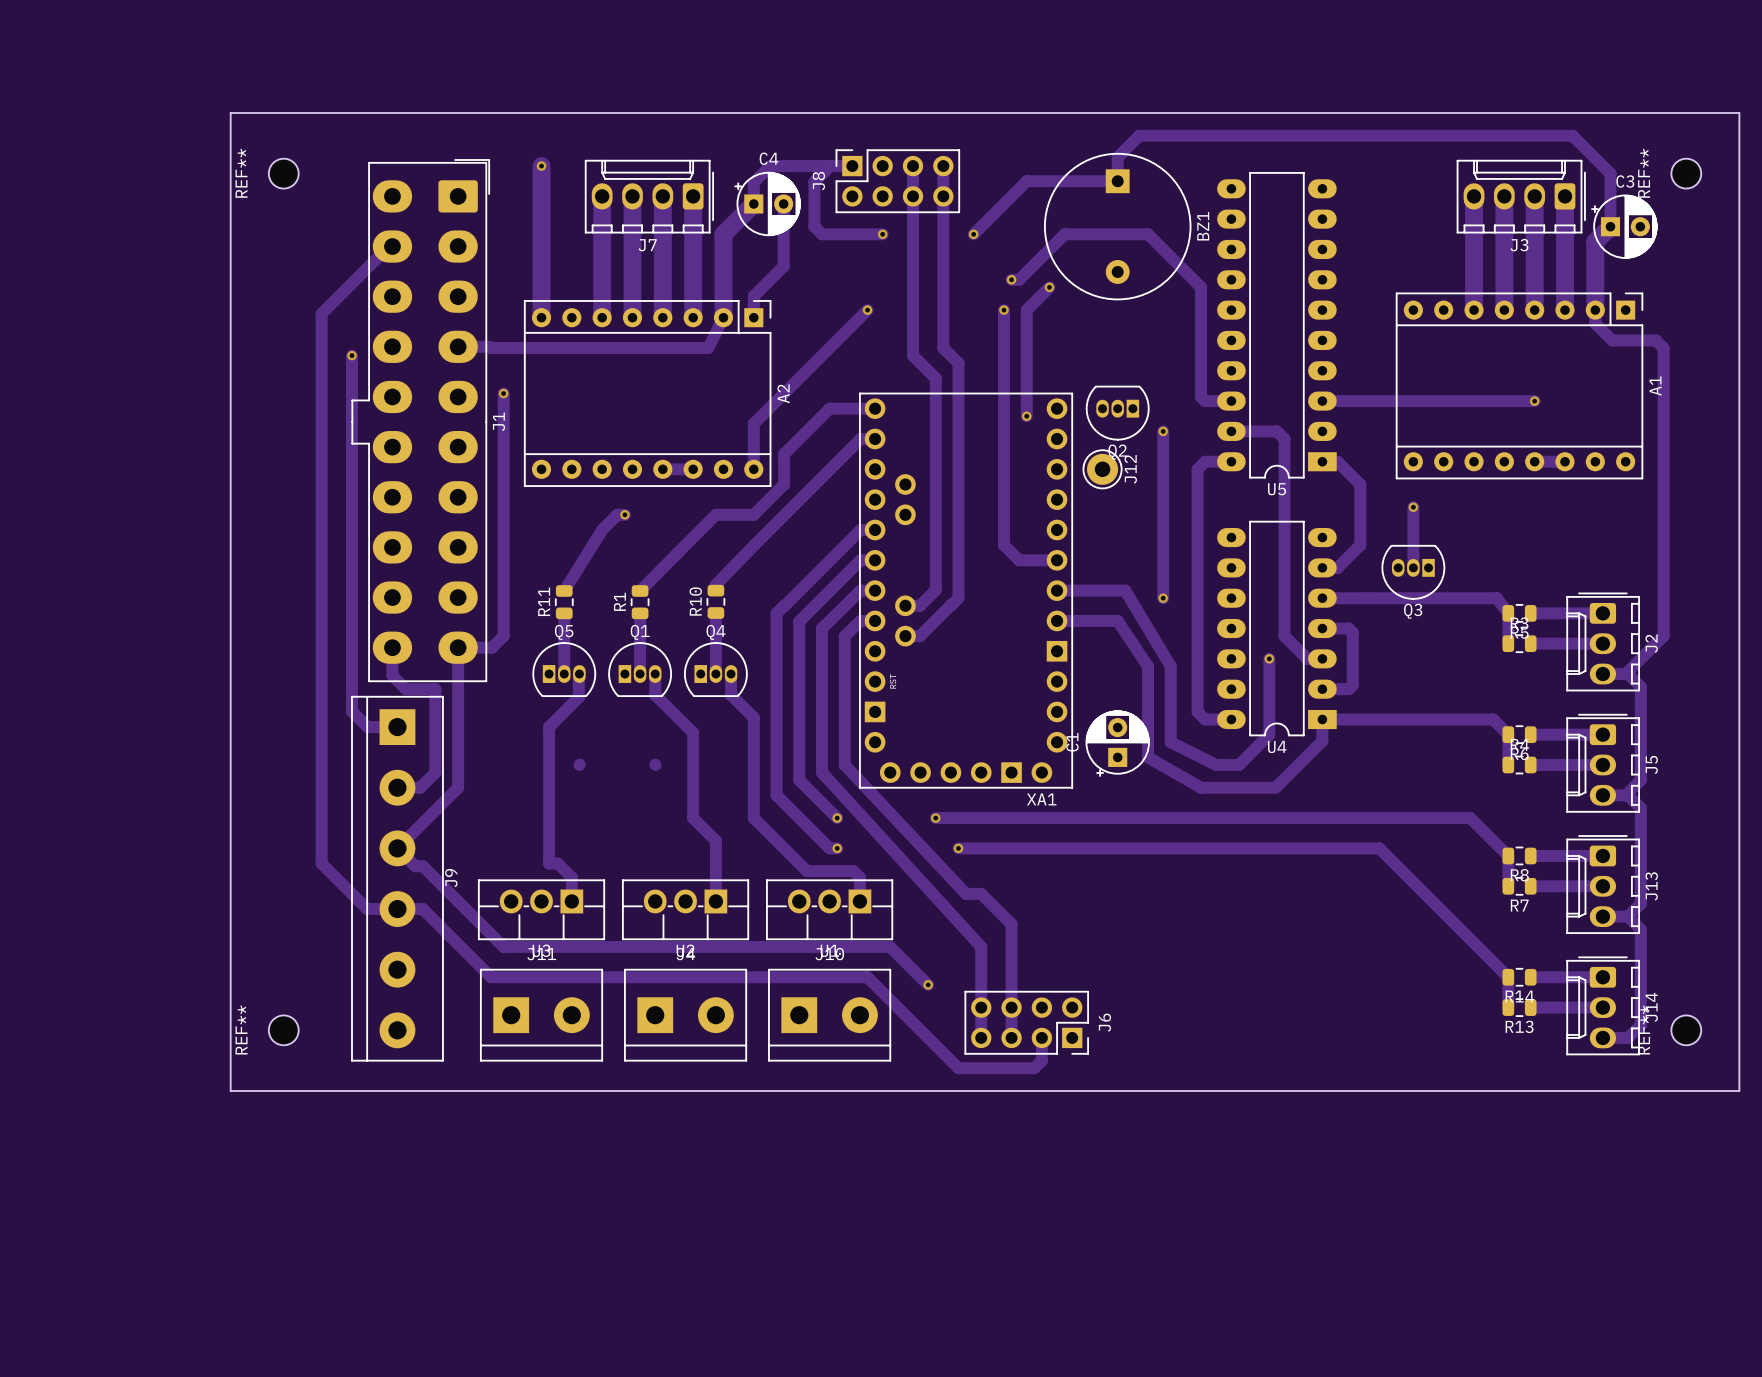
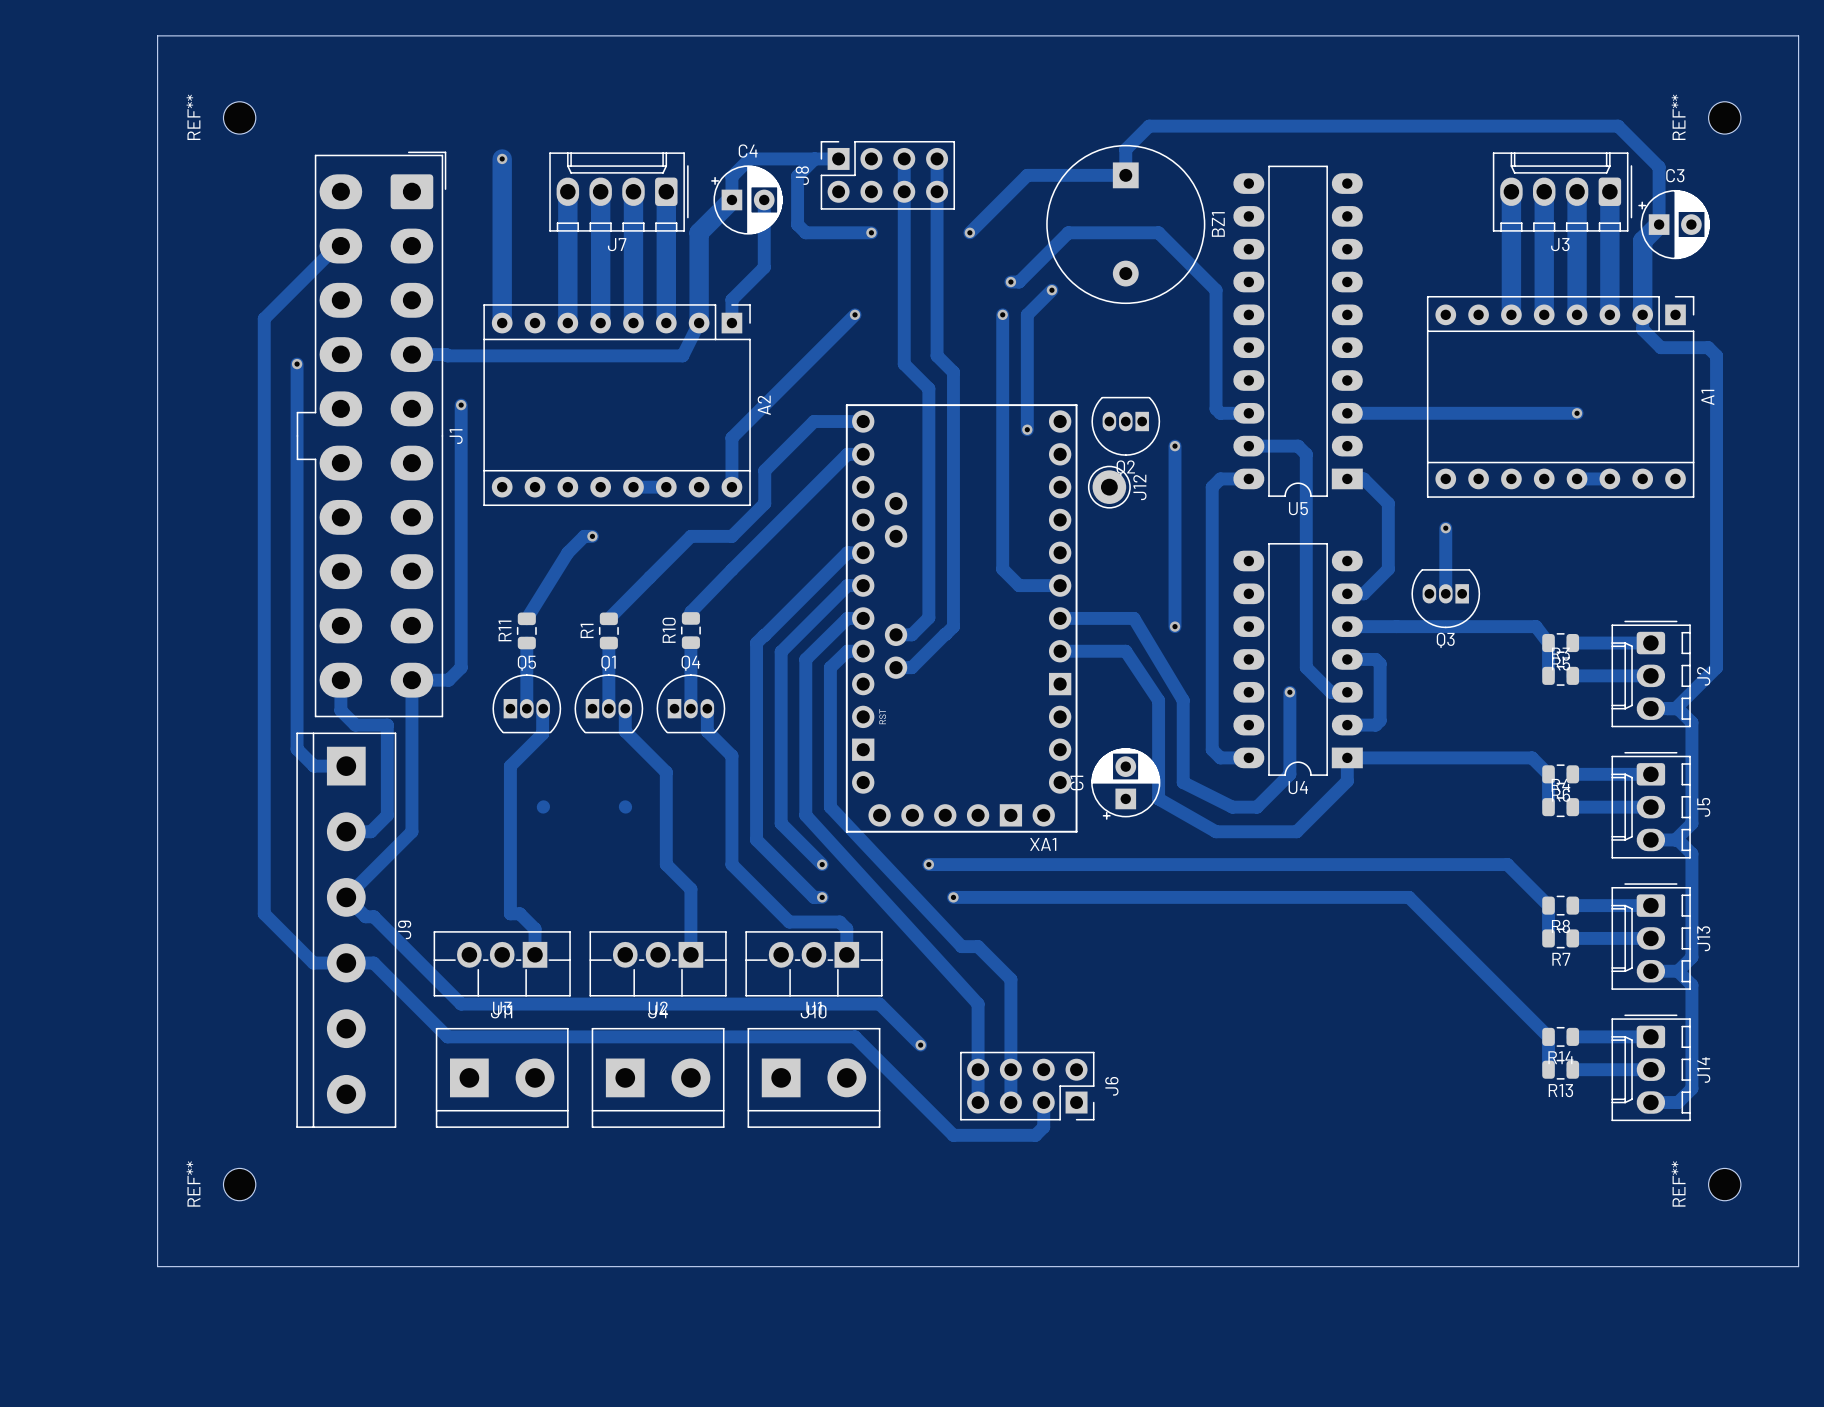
board edge: (1739, 113) (230, 113) (230, 1090) (1739, 1090) -> (1798, 101) (1798, 35) (157, 35) (157, 1266) (1798, 1266) (1798, 1159)
REF** position: (283, 173) -> (239, 117)
REF** position: (1686, 173) -> (1724, 117)
REF** position: (283, 1030) -> (239, 1184)
REF** position: (1686, 1030) -> (1724, 1184)

